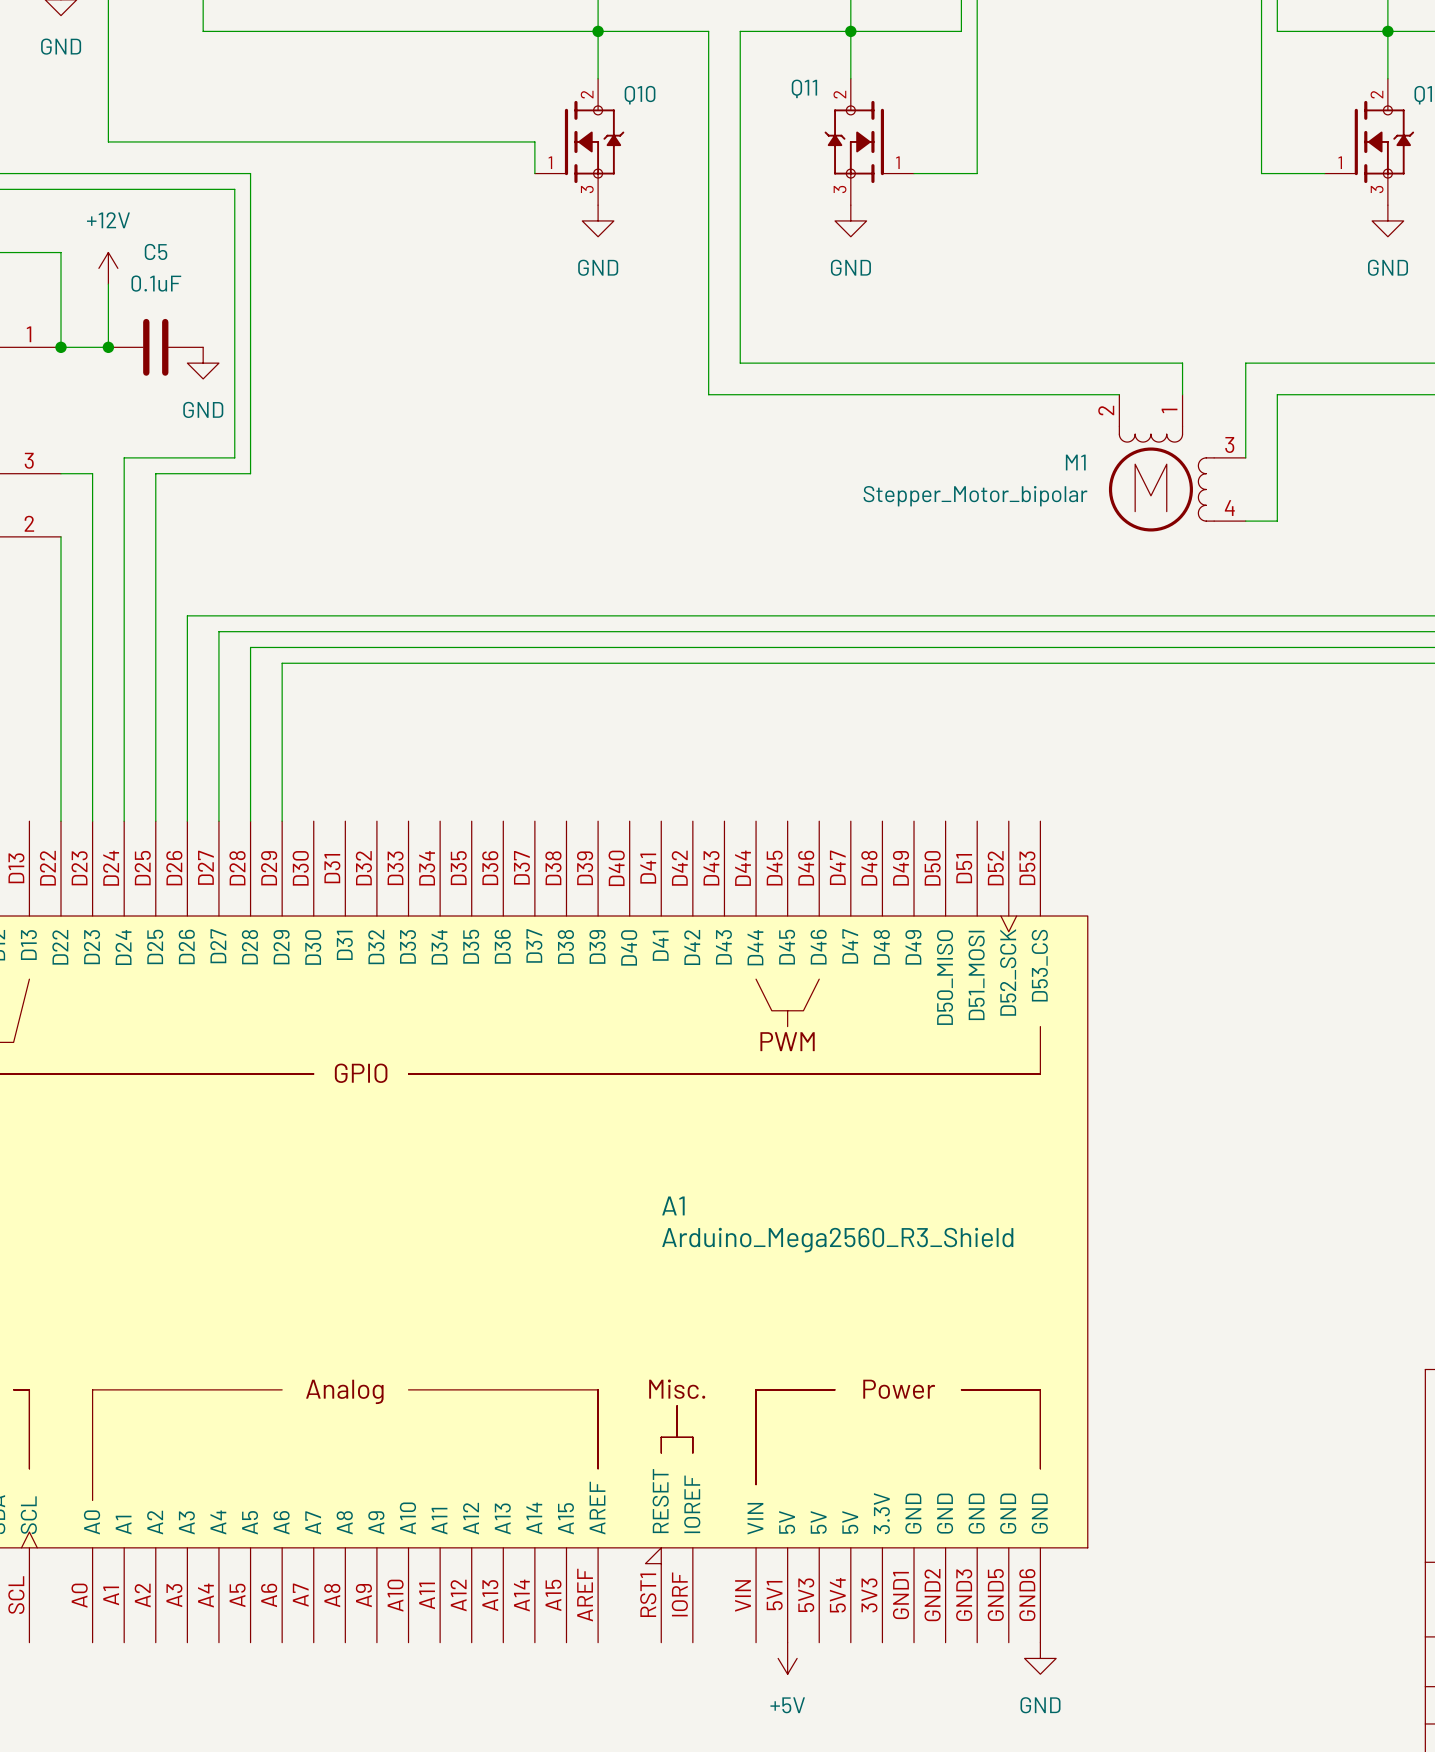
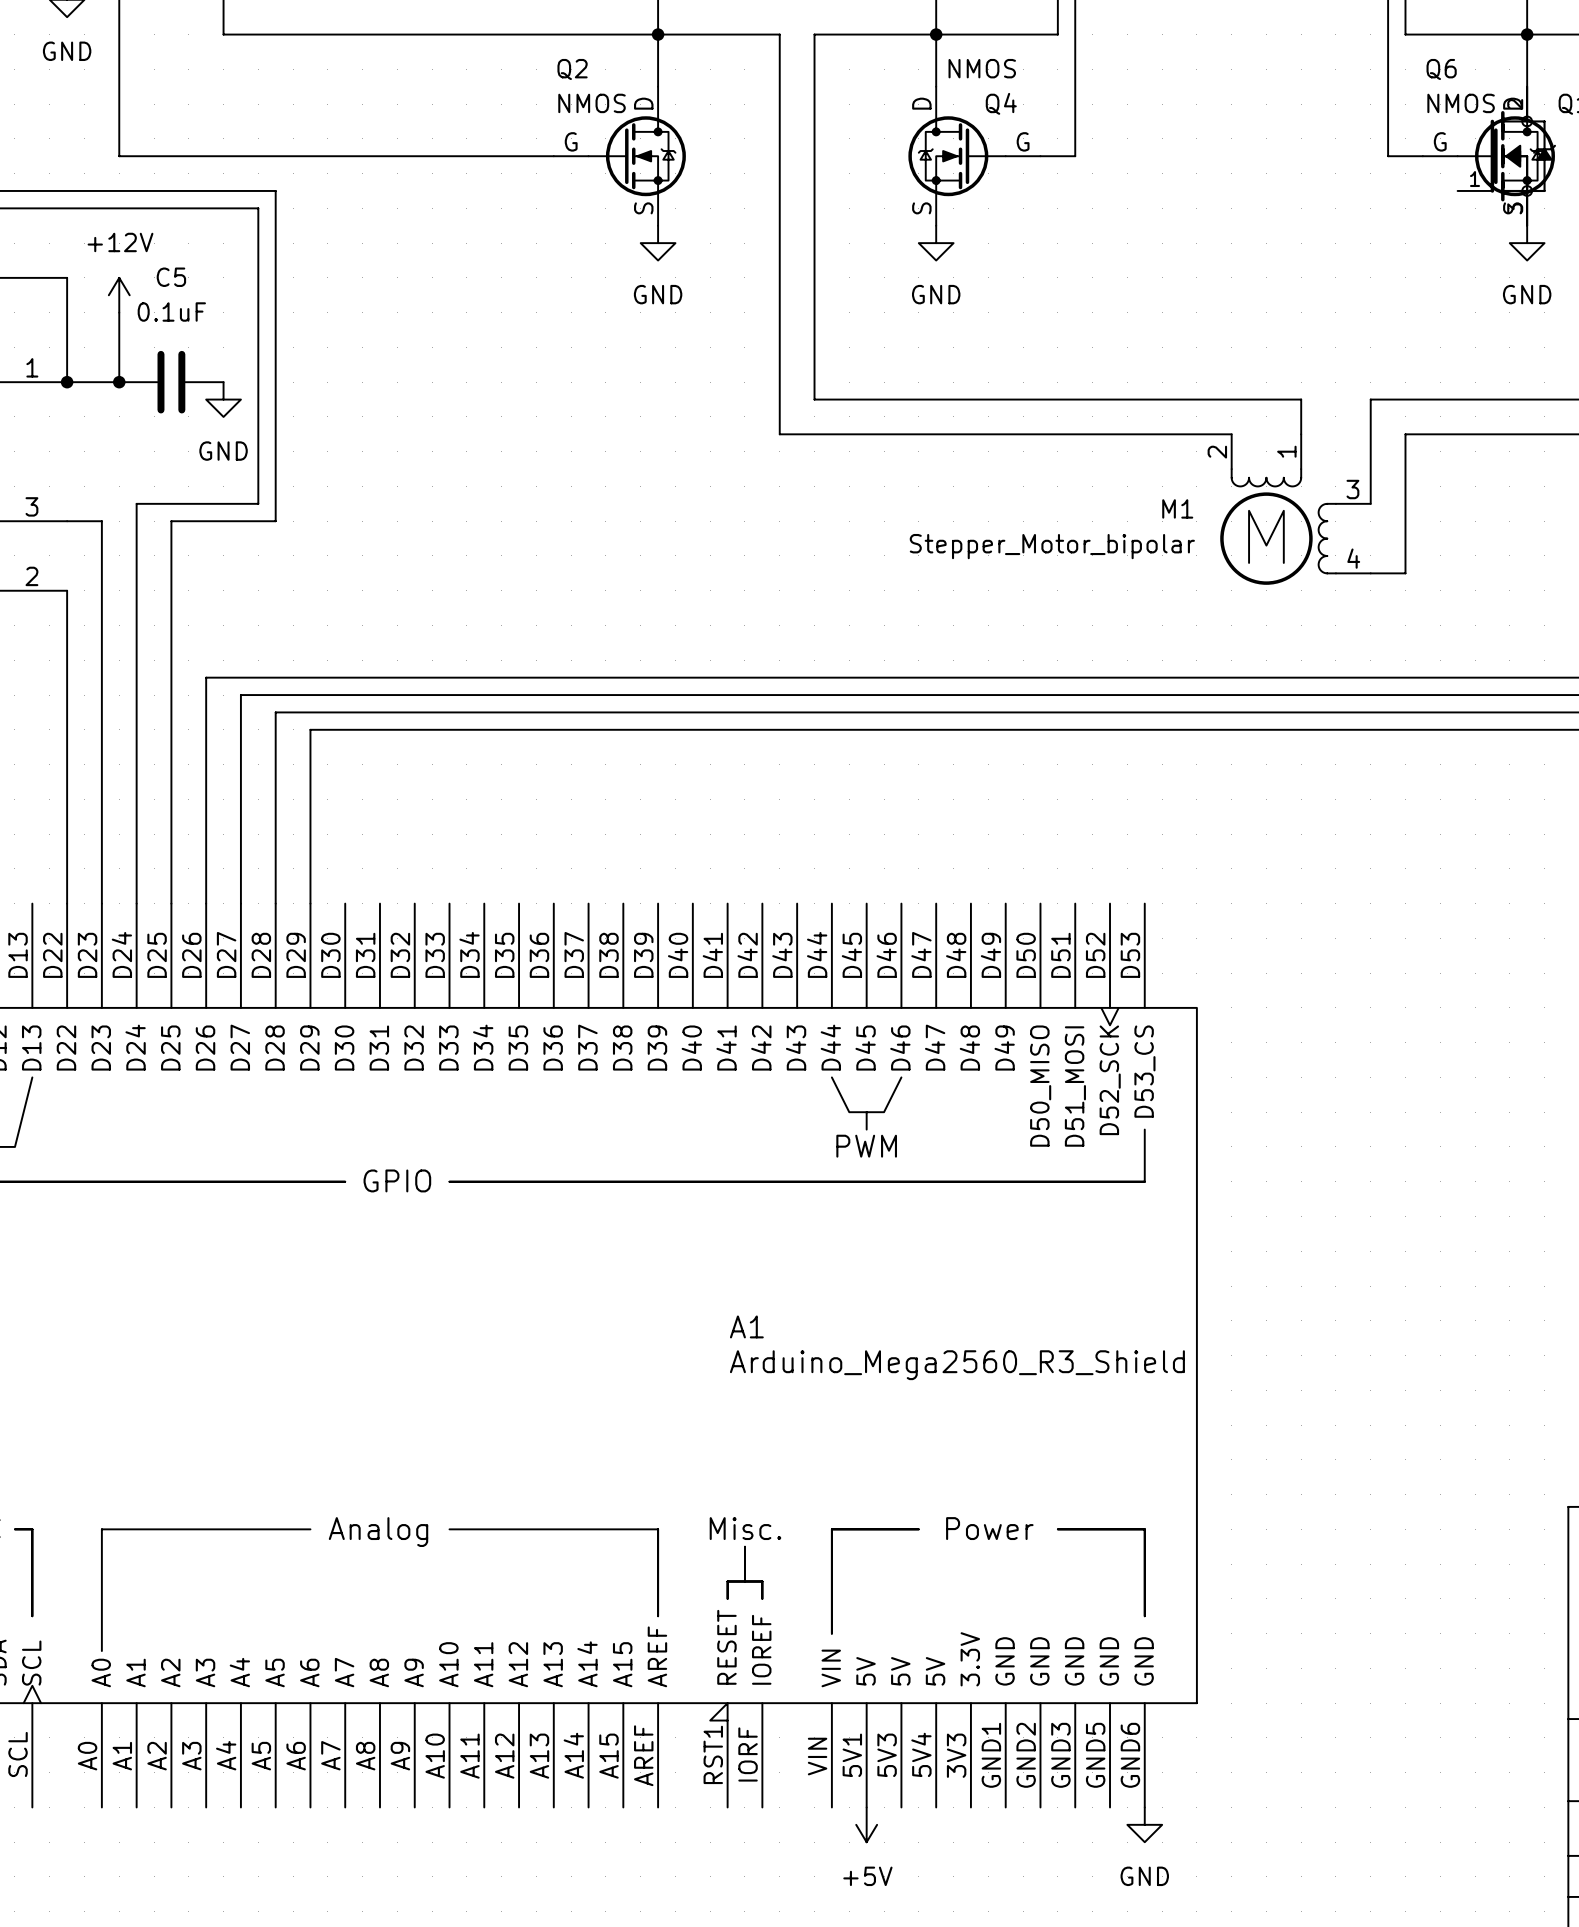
wire: (503, 141) (534, 141) (534, 173) -> none
Q2: none -> NMOS (619, 156)
Q10: (579, 141) -> none
Q11: (869, 141) -> none
Q4: none -> NMOS (974, 156)
wire: (977, 141) (977, 173) (914, 173) -> (1075, 156) (1040, 156)
wire: (1261, 141) (1261, 173) (1324, 173) -> (1388, 156) (1422, 156)
Q6: none -> NMOS (1488, 156)

